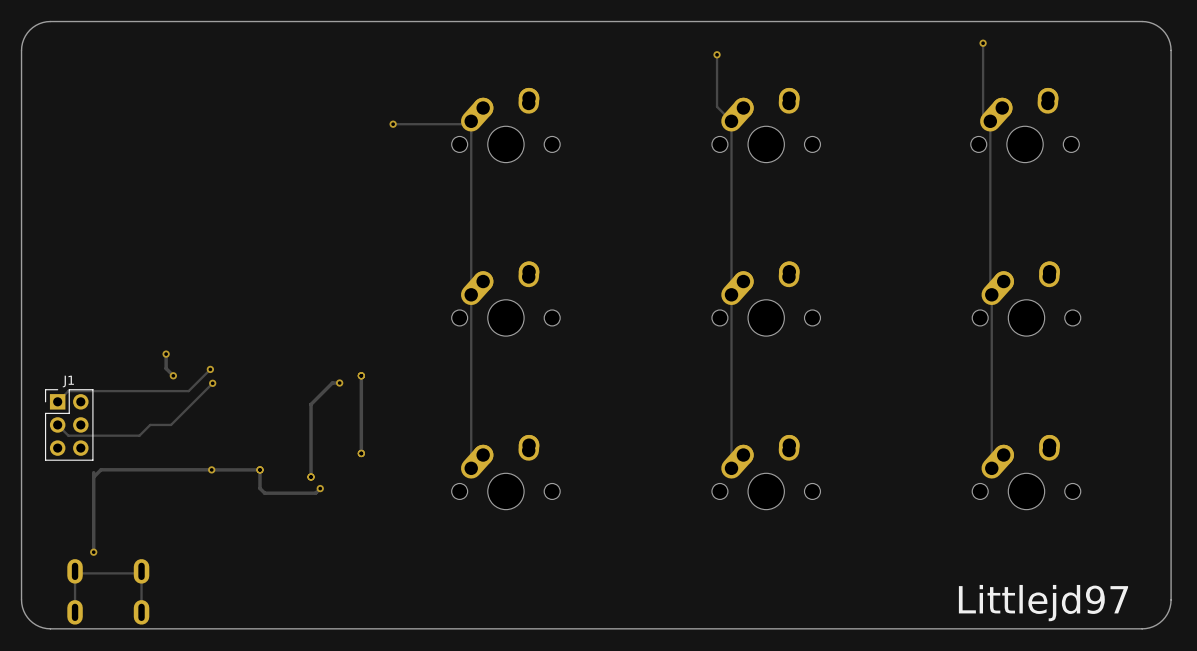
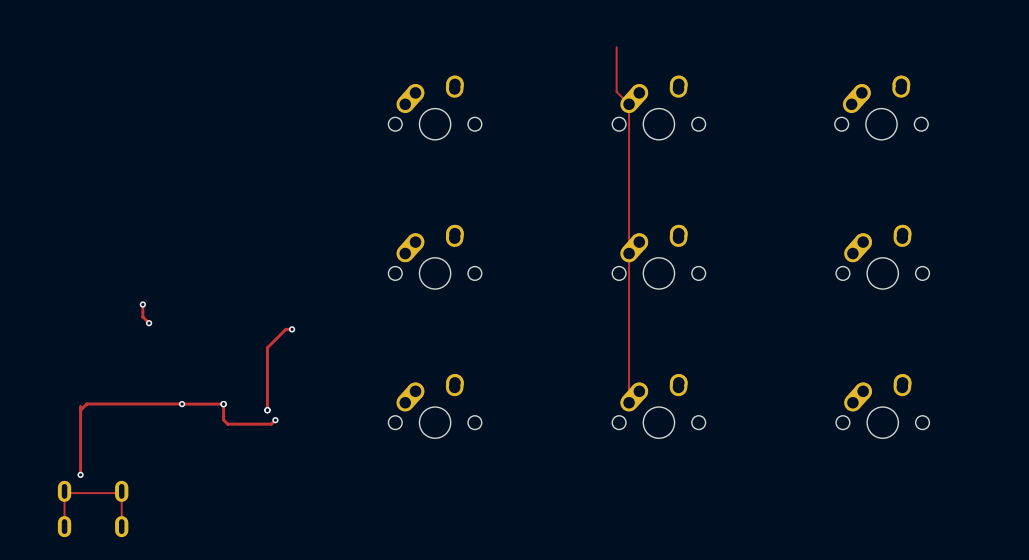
board edge: (50, 21) (1142, 21) (1156, 25) (1167, 35) (1171, 50) (1171, 599) (1167, 614) (1156, 624) (1142, 628) (50, 628) (35, 624) (25, 614) (21, 599) (21, 50) (23, 39) (30, 30) (39, 23) (50, 21) -> none
track: (983, 43) (983, 114) (990, 121) (991, 474) -> none
via: (983, 43) -> none
via: (717, 54) -> none
track: (483, 108) (466, 124) (393, 124) -> none
track: (471, 121) (471, 468) -> none
via: (393, 124) -> none
track: (210, 369) (188, 391) (68, 391) (57, 401) -> none
via: (210, 369) -> none
track: (361, 375) (361, 453) -> none
via: (361, 375) -> none
track: (212, 383) (171, 424) (150, 424) (139, 435) (68, 435) (57, 424) -> none
via: (212, 383) -> none
J1: (69, 424) -> none
via: (361, 453) -> none
text: Littlejd97 (1043, 603) -> none

